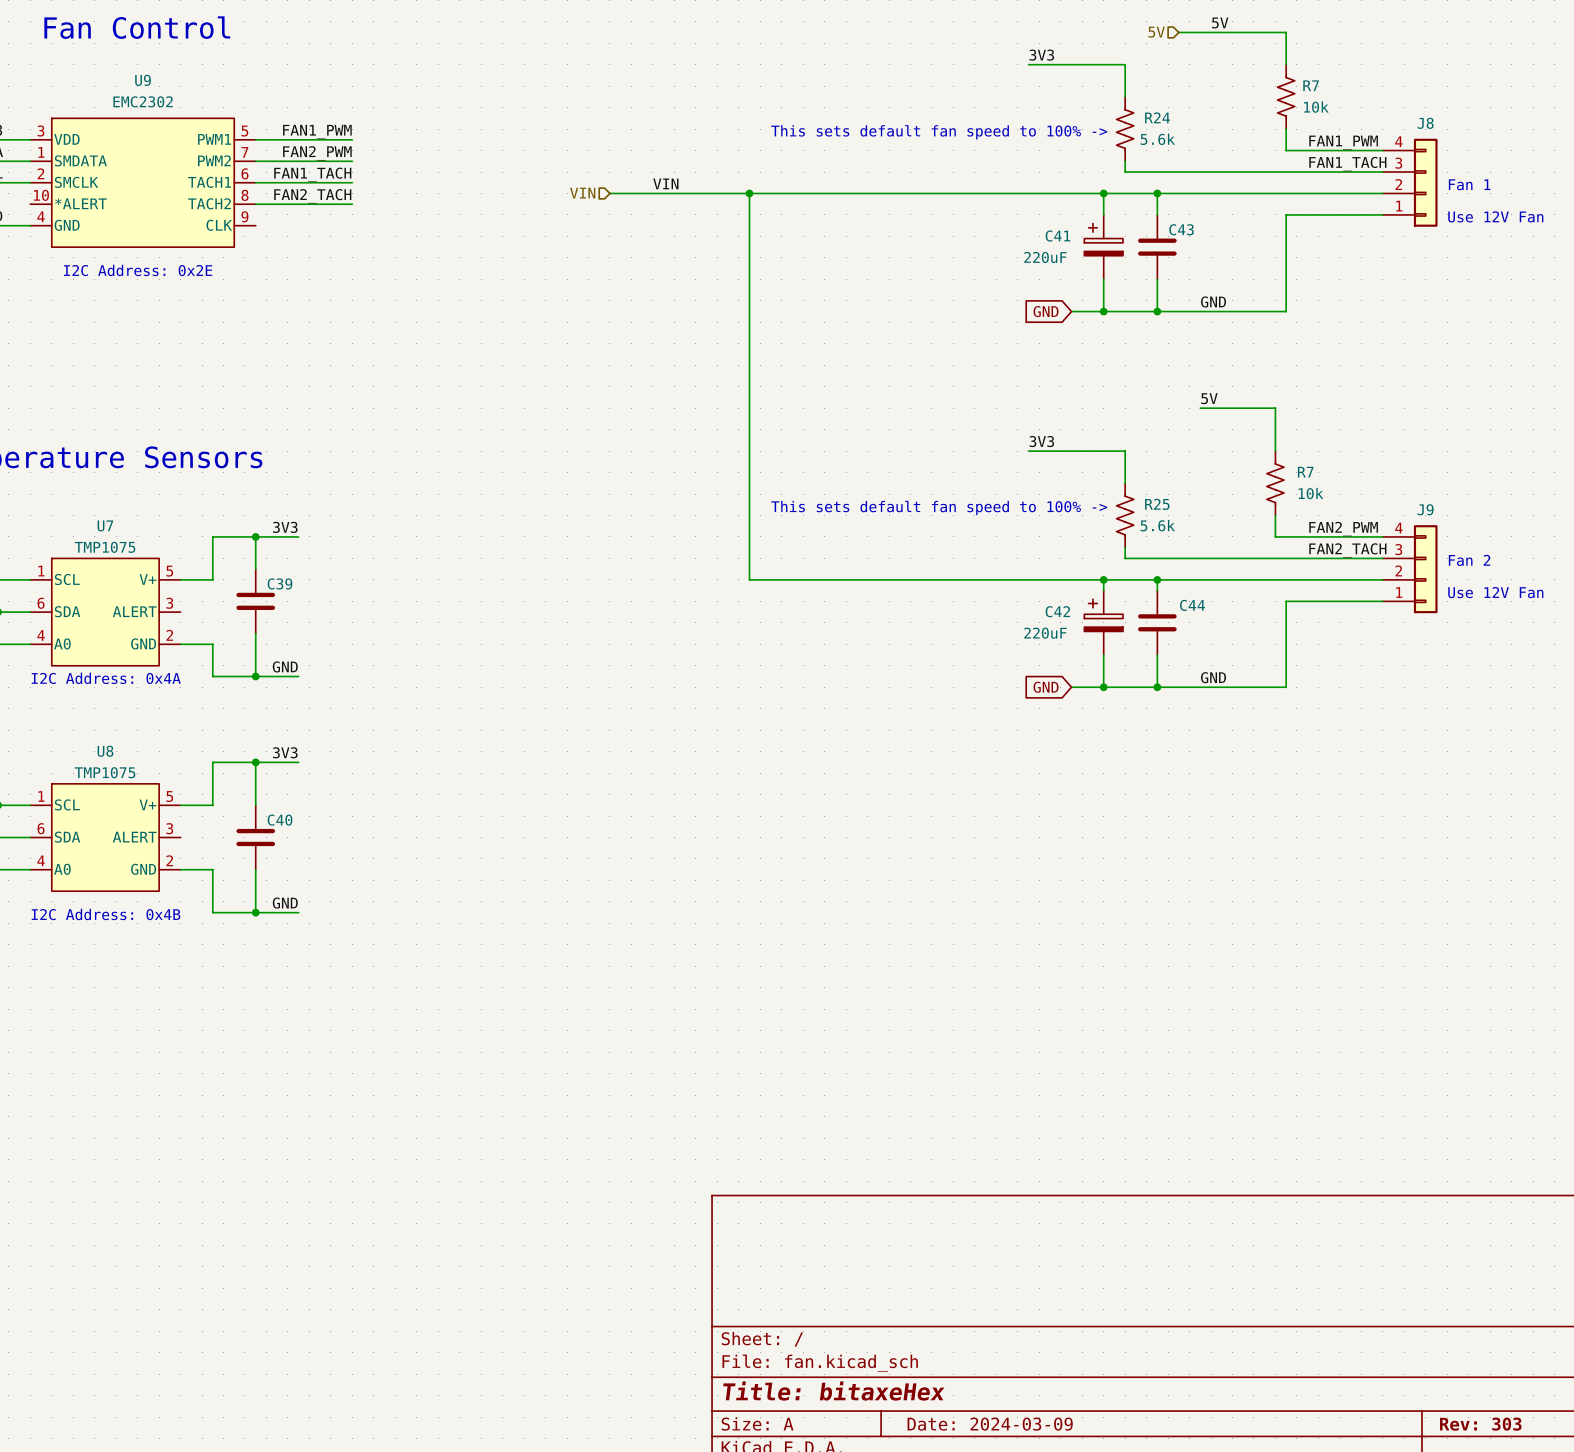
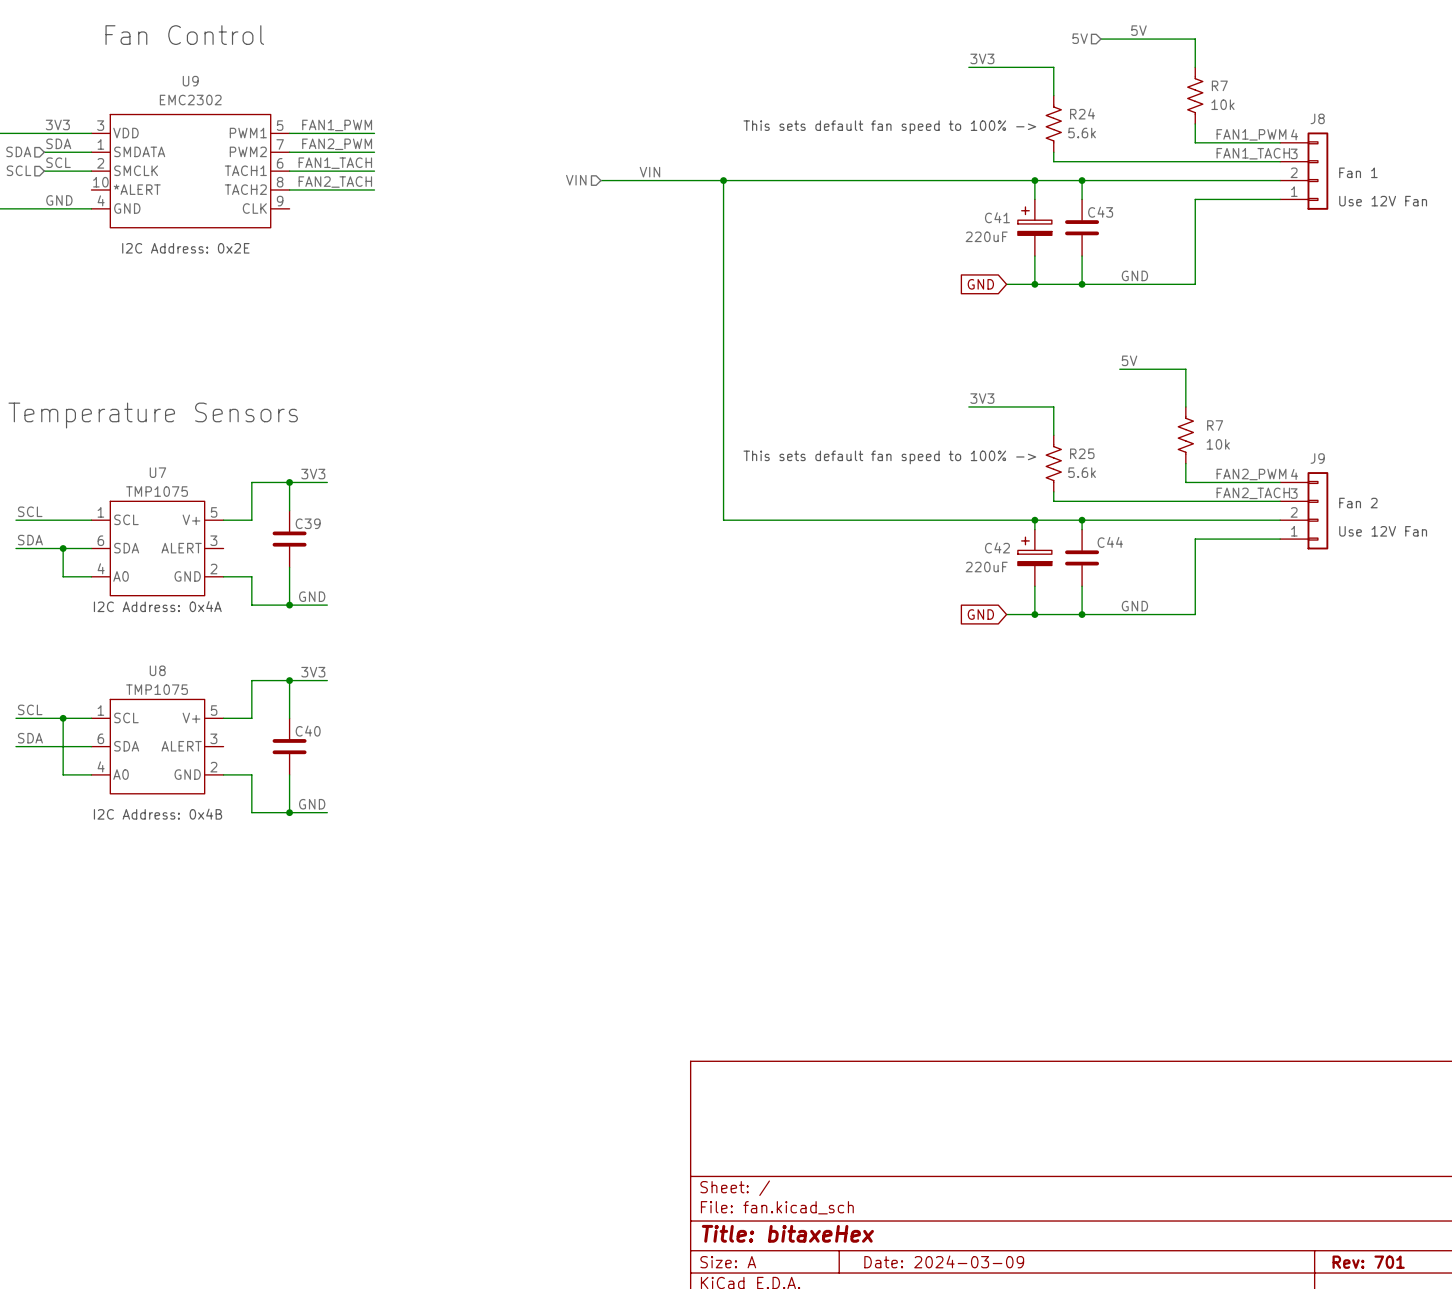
title block: Rev: 303 (1480, 1424) -> Rev: 701 (1368, 1262)

